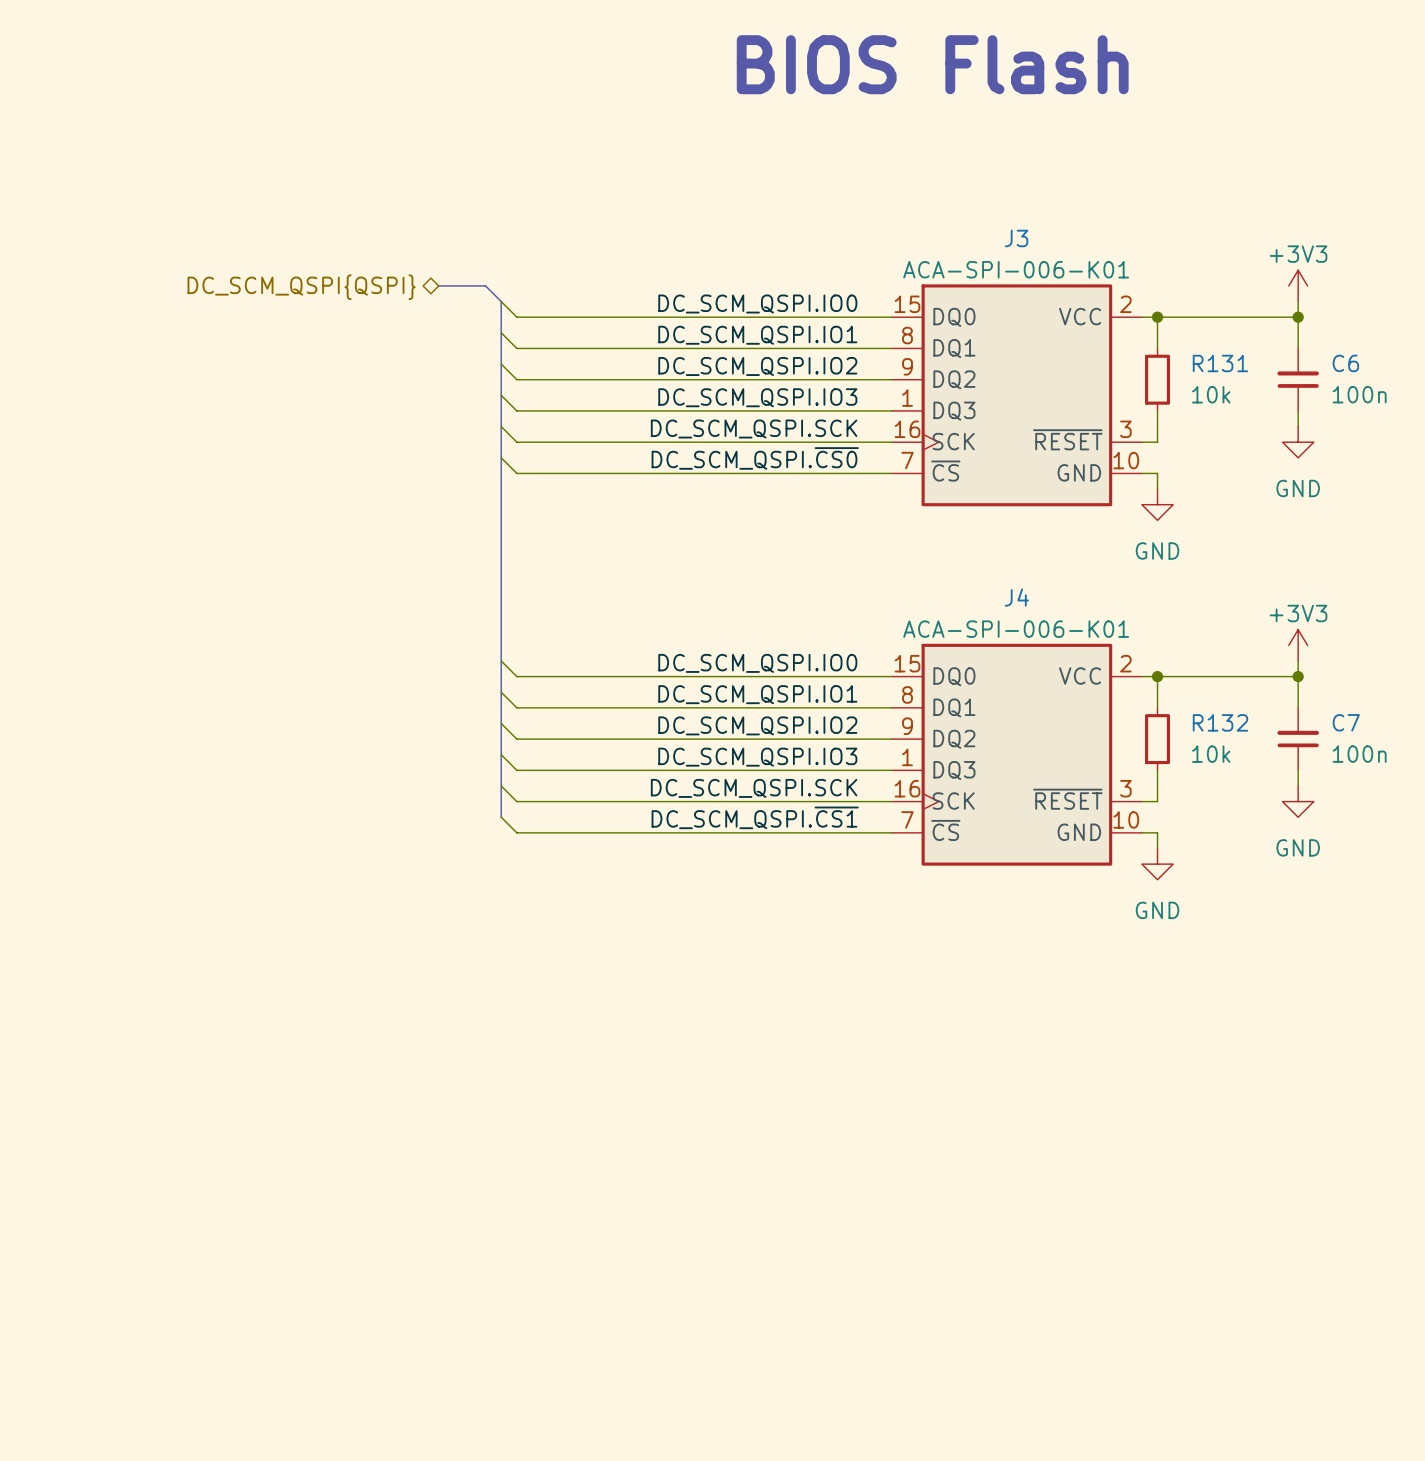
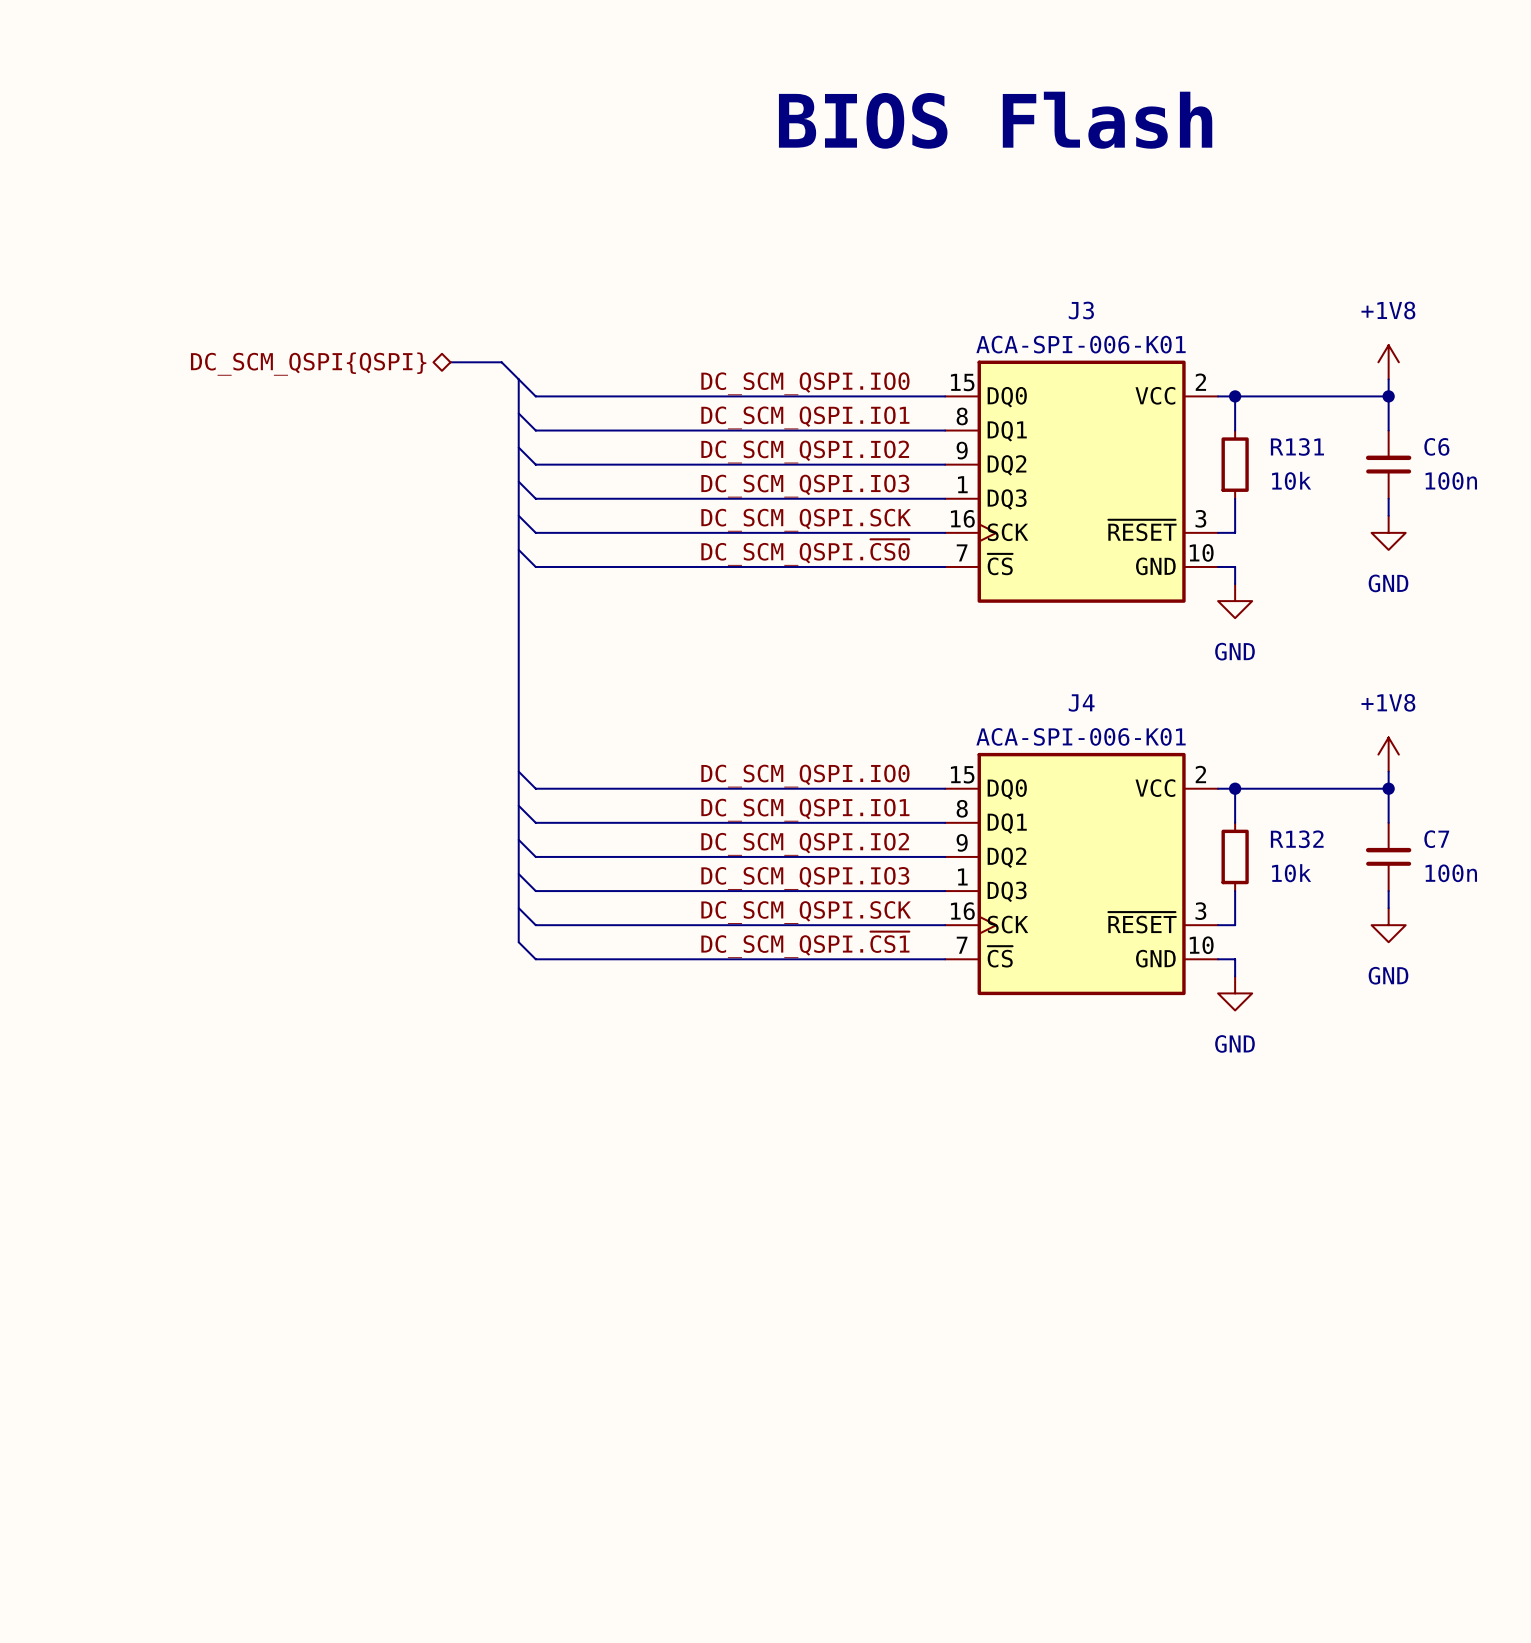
power symbol: +3V3 (1298, 285) -> +1V8 (1388, 362)
power symbol: +3V3 (1298, 645) -> +1V8 (1388, 754)

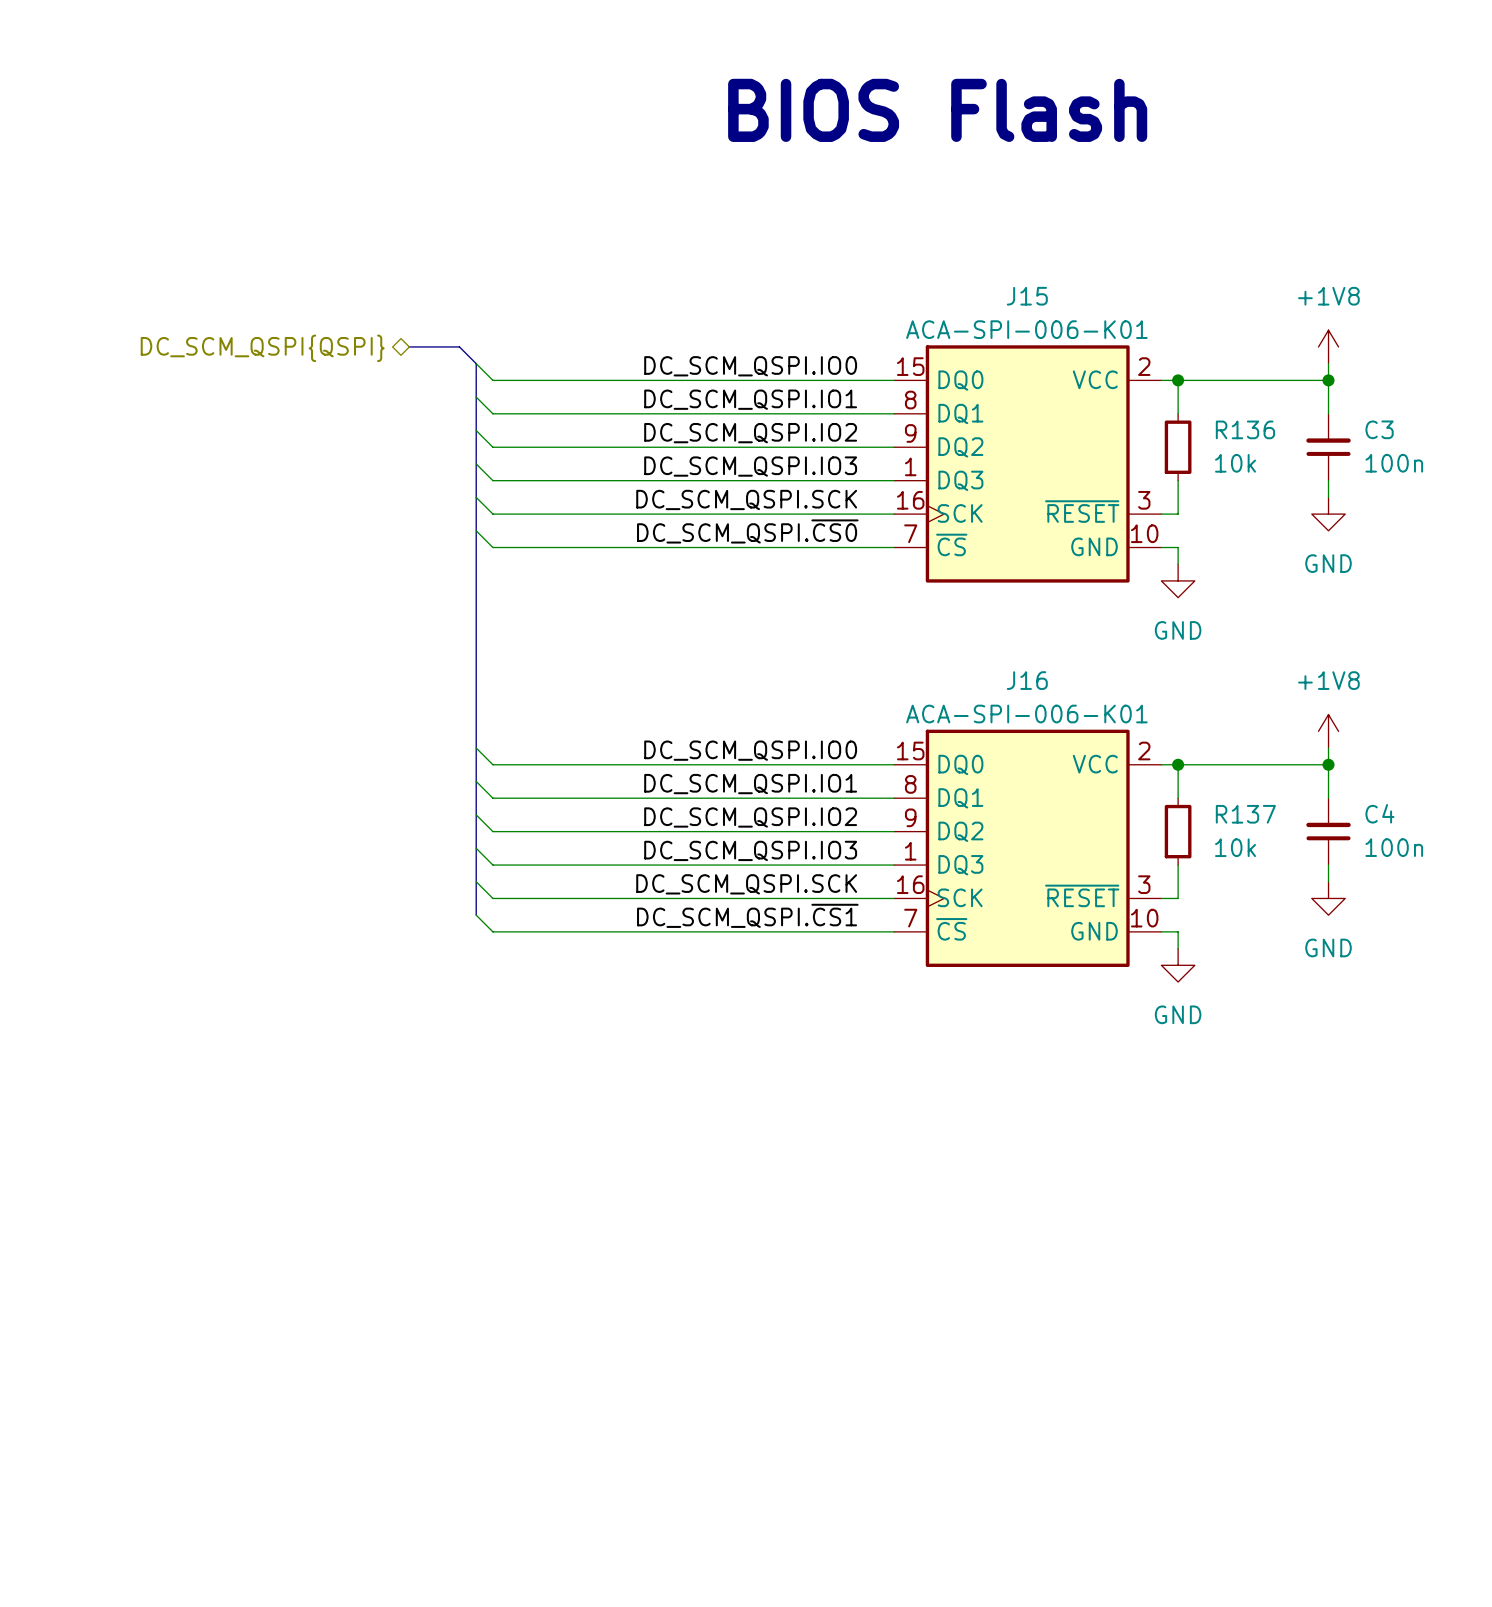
J3 name: J3 (1081, 310) -> J15 (1027, 296)
R131 name: R131 (1297, 446) -> R136 (1245, 429)
C6 name: C6 (1436, 446) -> C3 (1379, 429)
J4 name: J4 (1081, 702) -> J16 (1027, 680)
R132 name: R132 (1297, 839) -> R137 (1245, 814)
C7 name: C7 (1436, 839) -> C4 (1379, 813)

